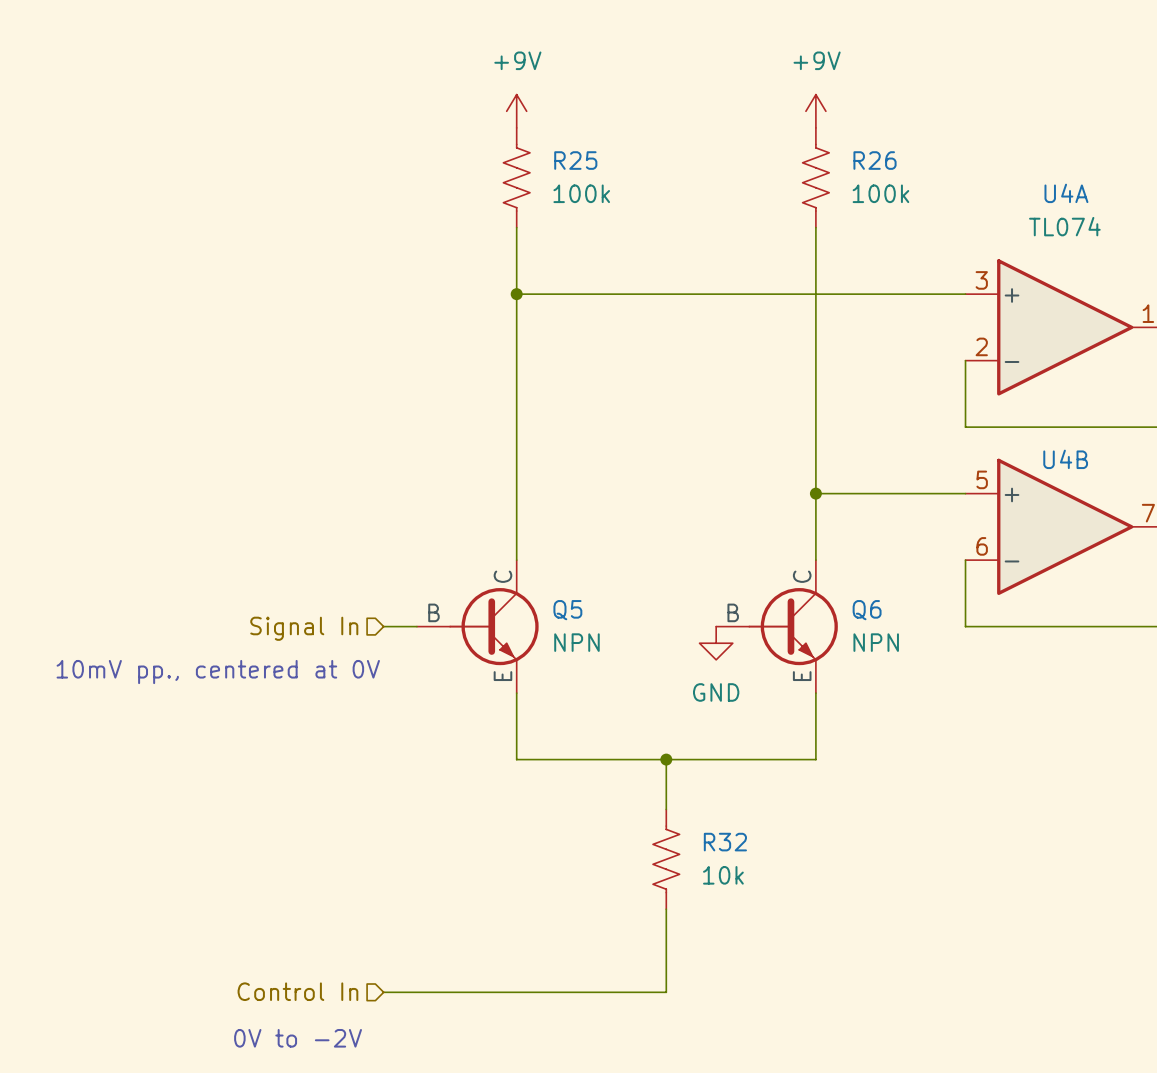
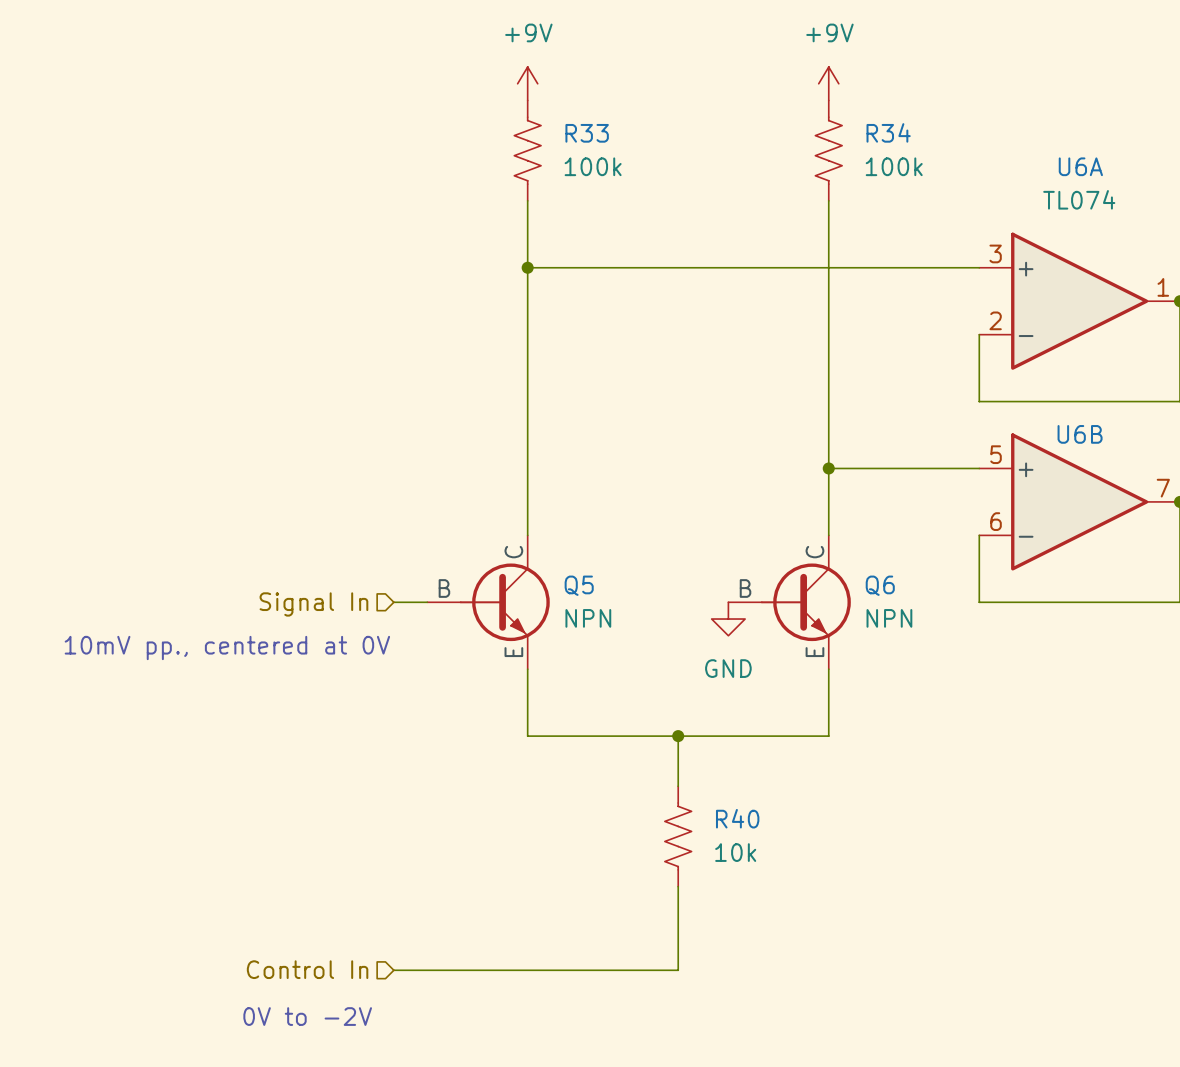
R25 name: R25 (575, 160) -> R33 (587, 133)
R26 name: R26 (875, 160) -> R34 (888, 132)
U4A name: U4A (1066, 193) -> U6A (1080, 166)
U4B name: U4B (1065, 459) -> U6B (1080, 434)
R32 name: R32 (725, 842) -> R40 (737, 818)

